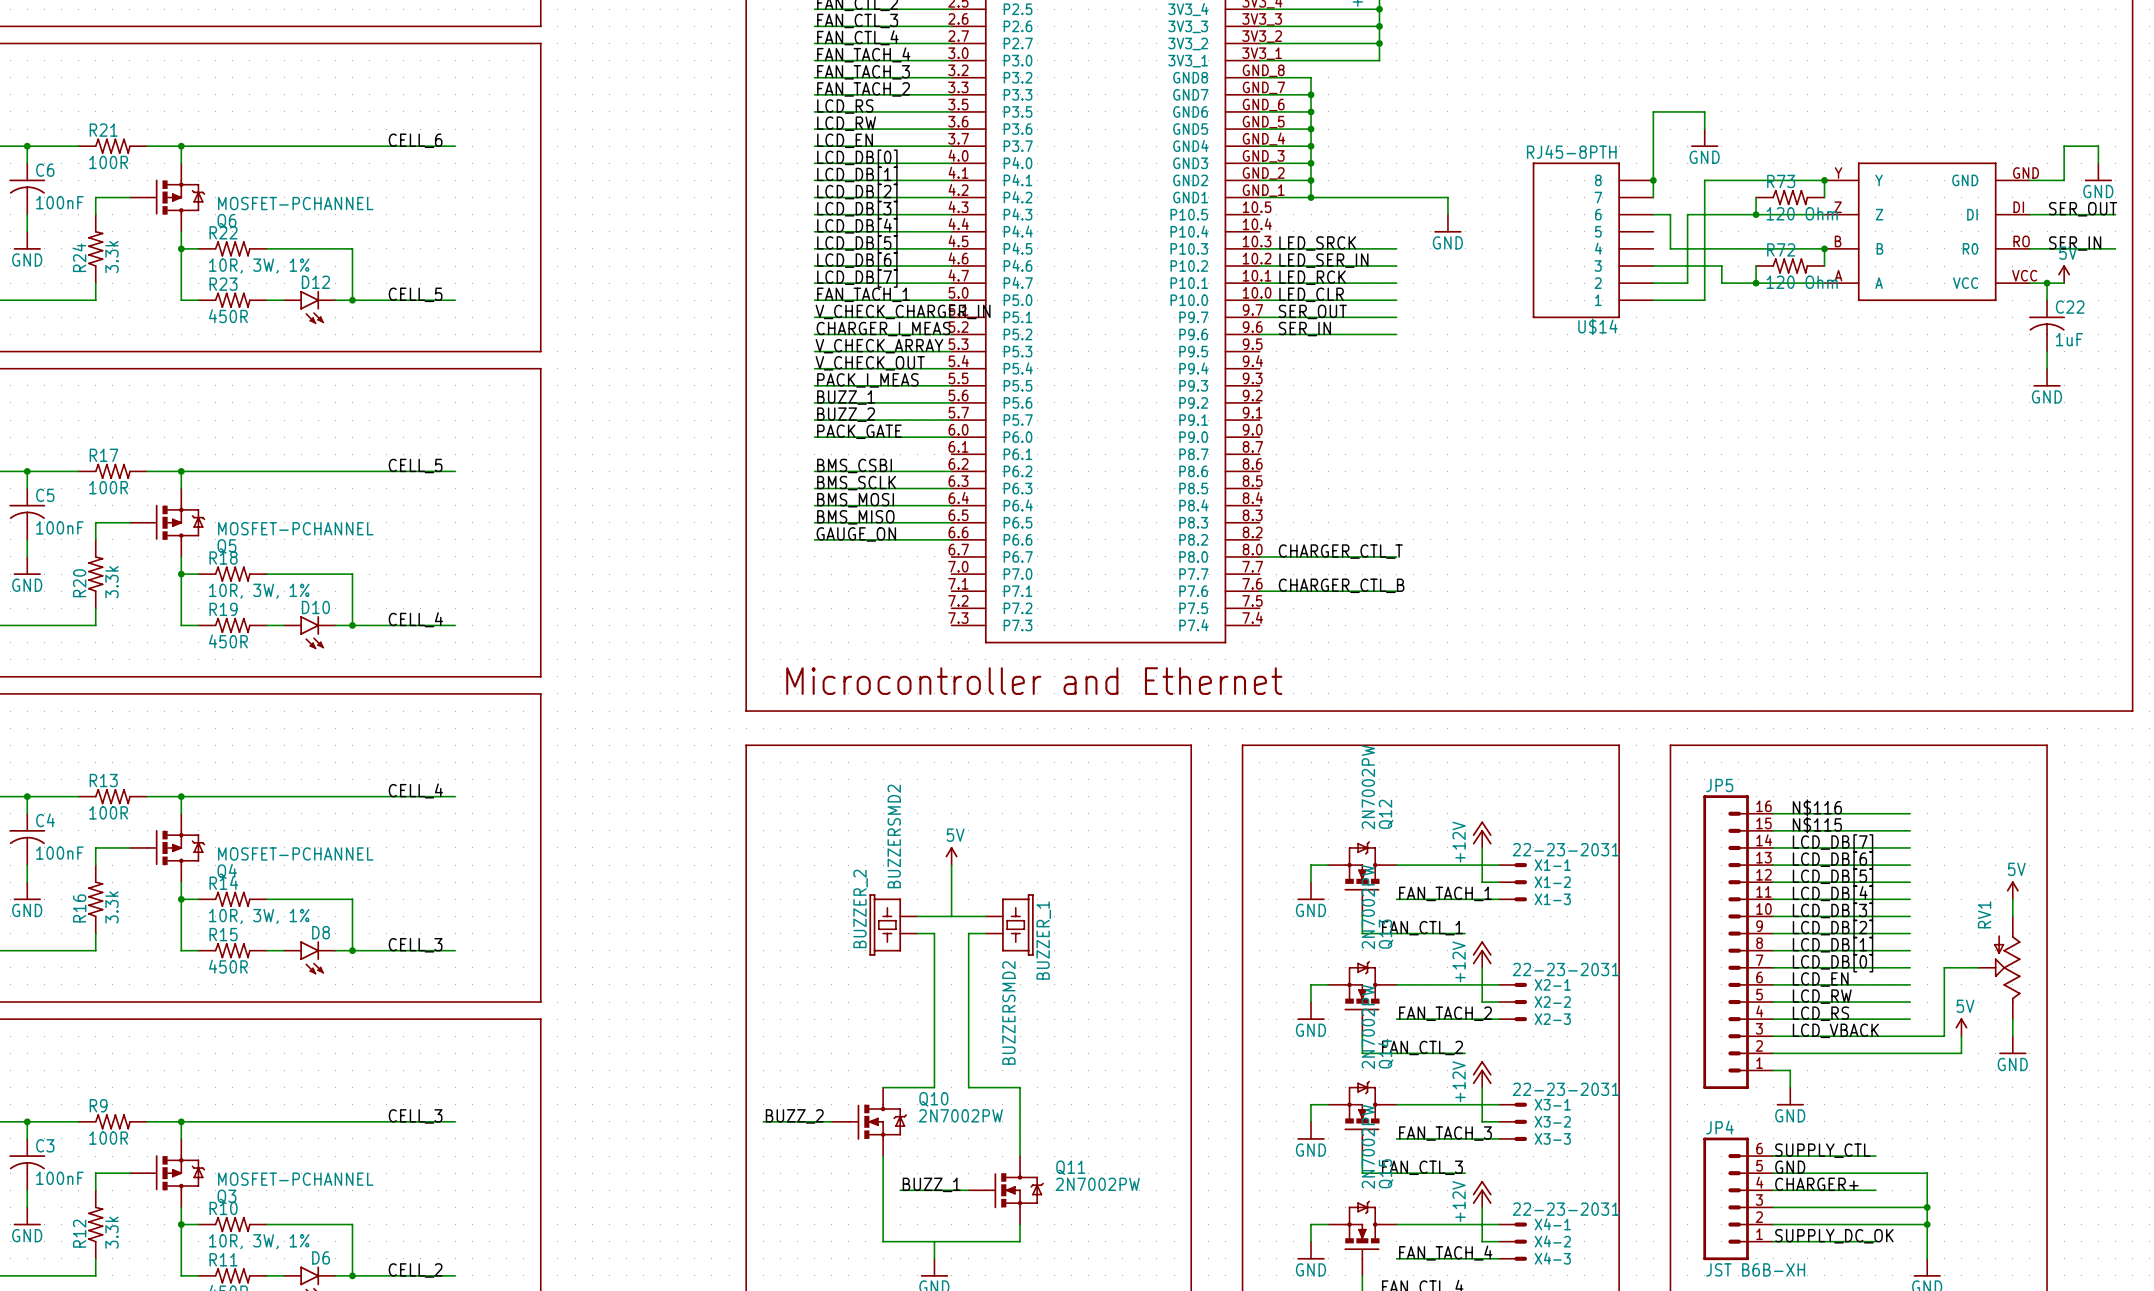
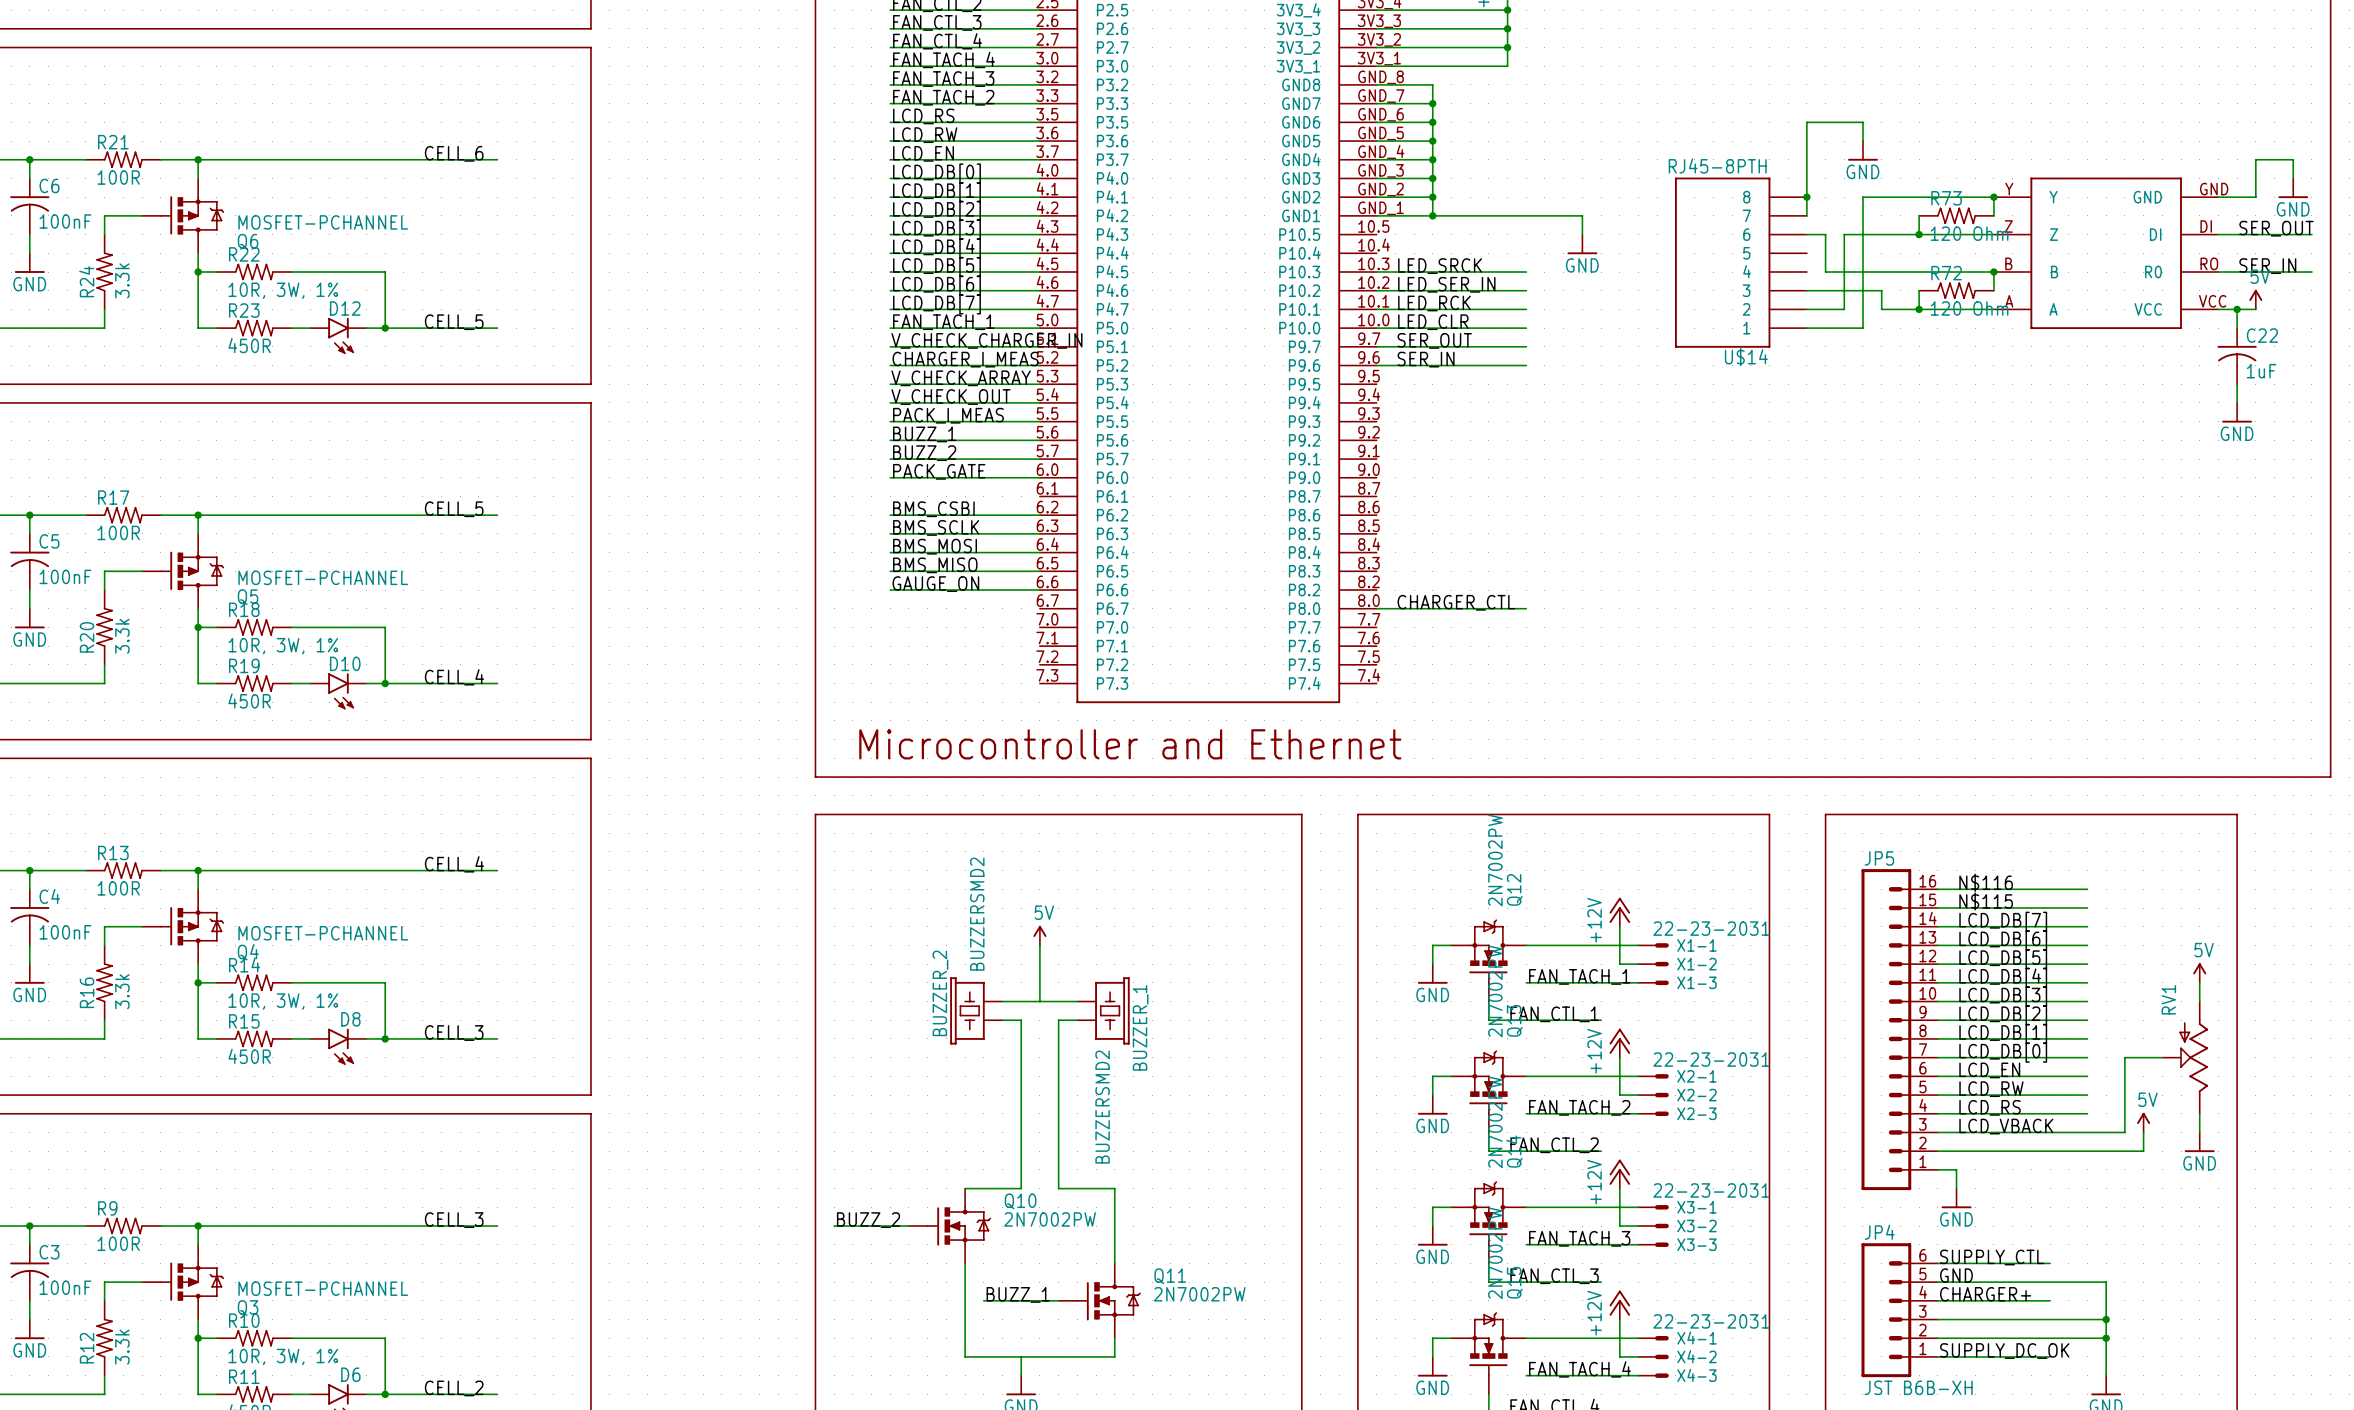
label: CHARGER_CTL_T (1340, 551) -> CHARGER_CTL (1456, 602)
label: CHARGER_CTL_B (1341, 585) -> none
wire: (1259, 591) (1396, 591) -> none

